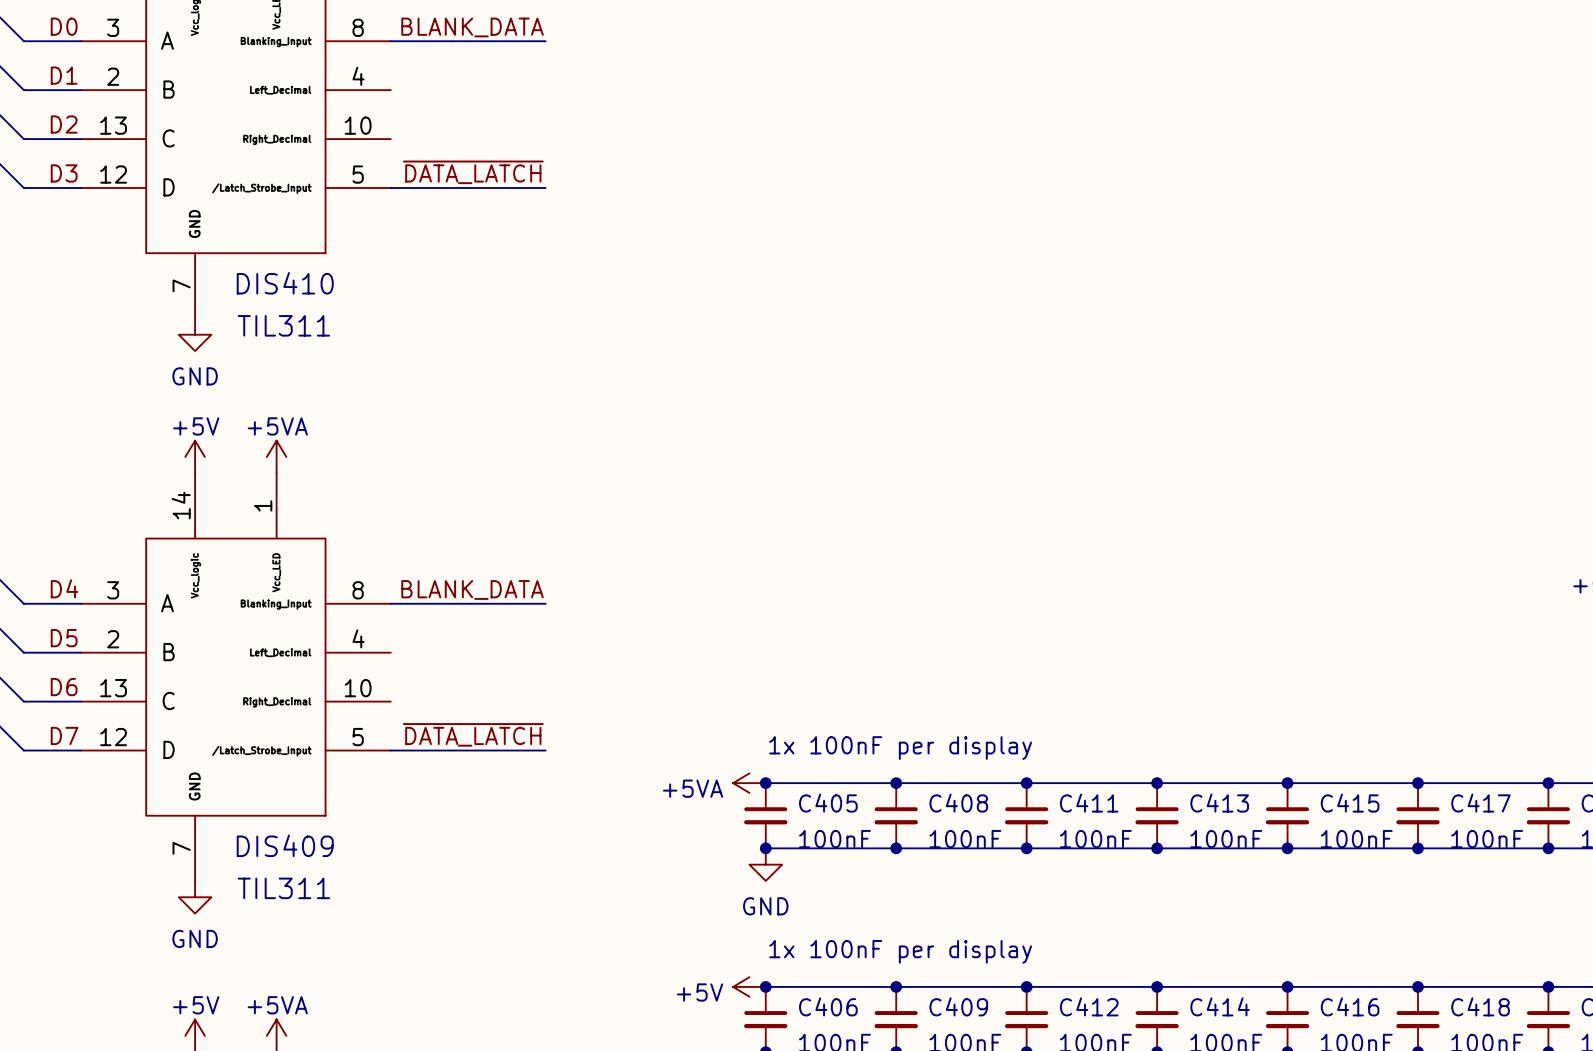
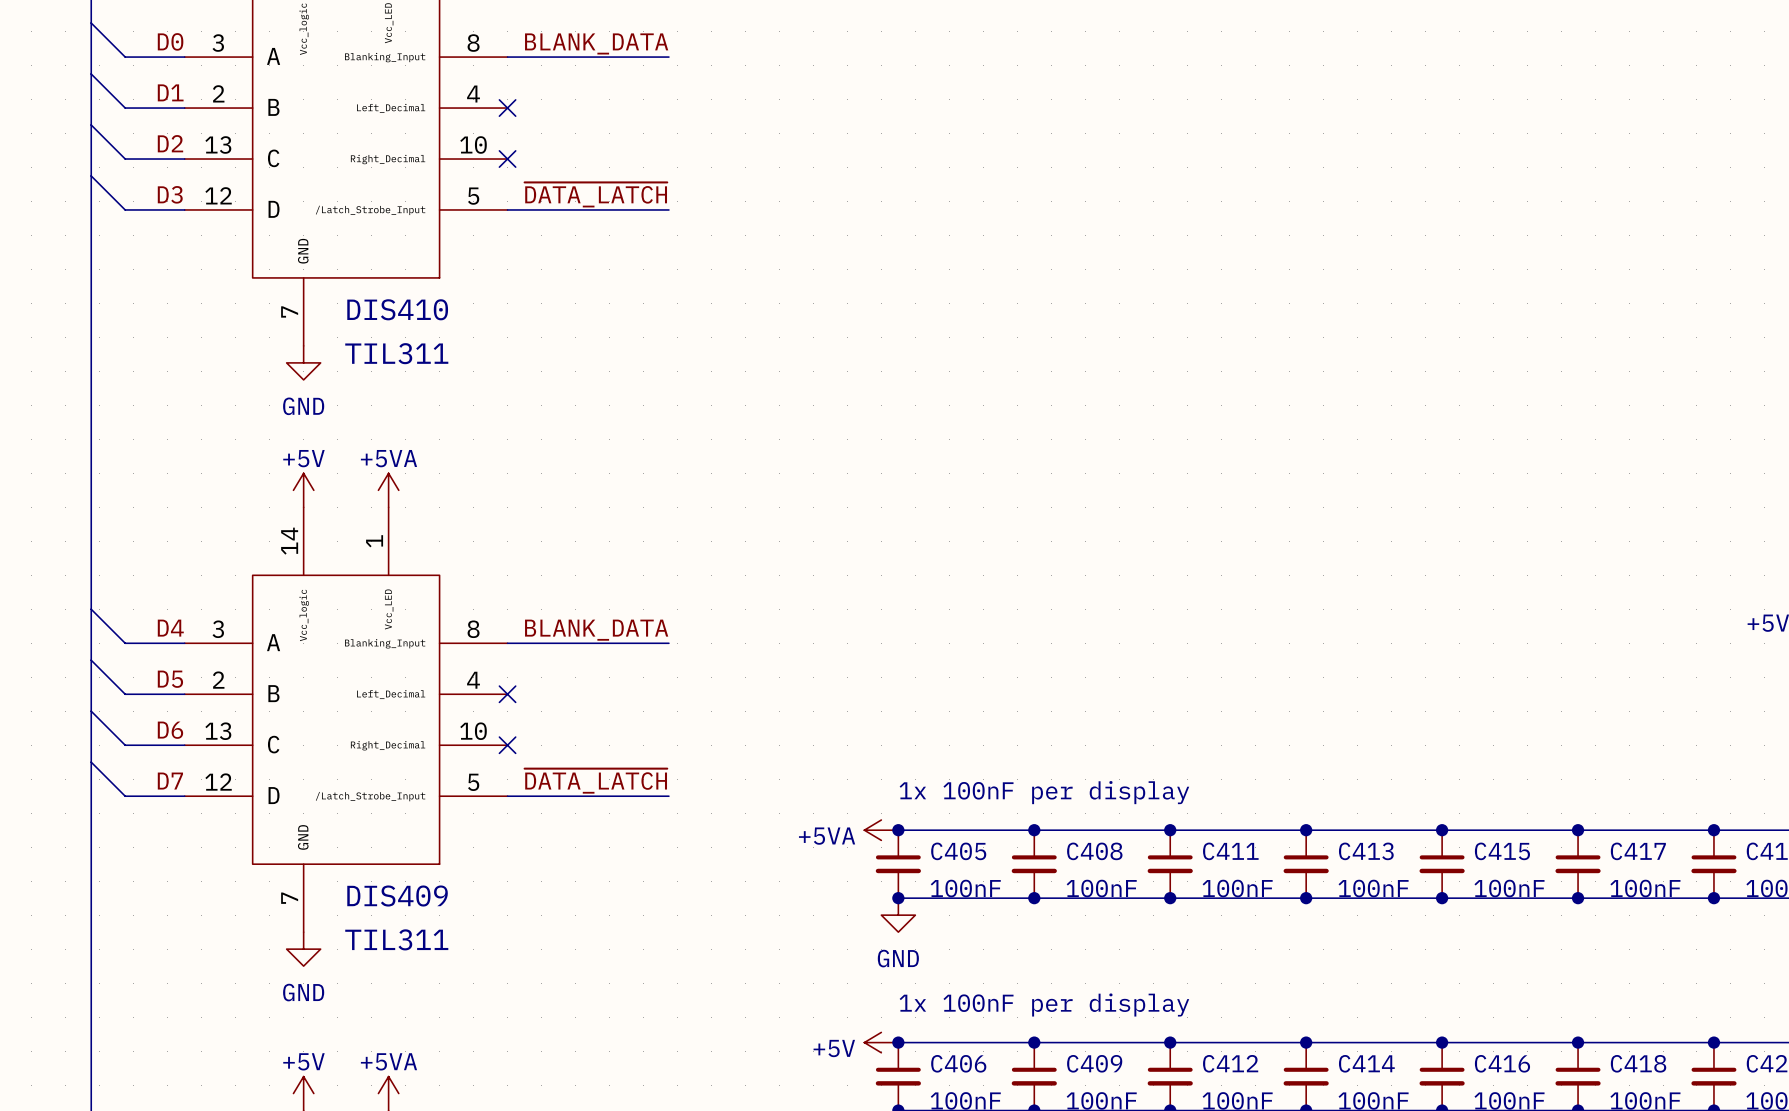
no-connect mark: none -> (507, 108)
no-connect mark: none -> (507, 159)
no-connect mark: none -> (507, 694)
no-connect mark: none -> (507, 745)

